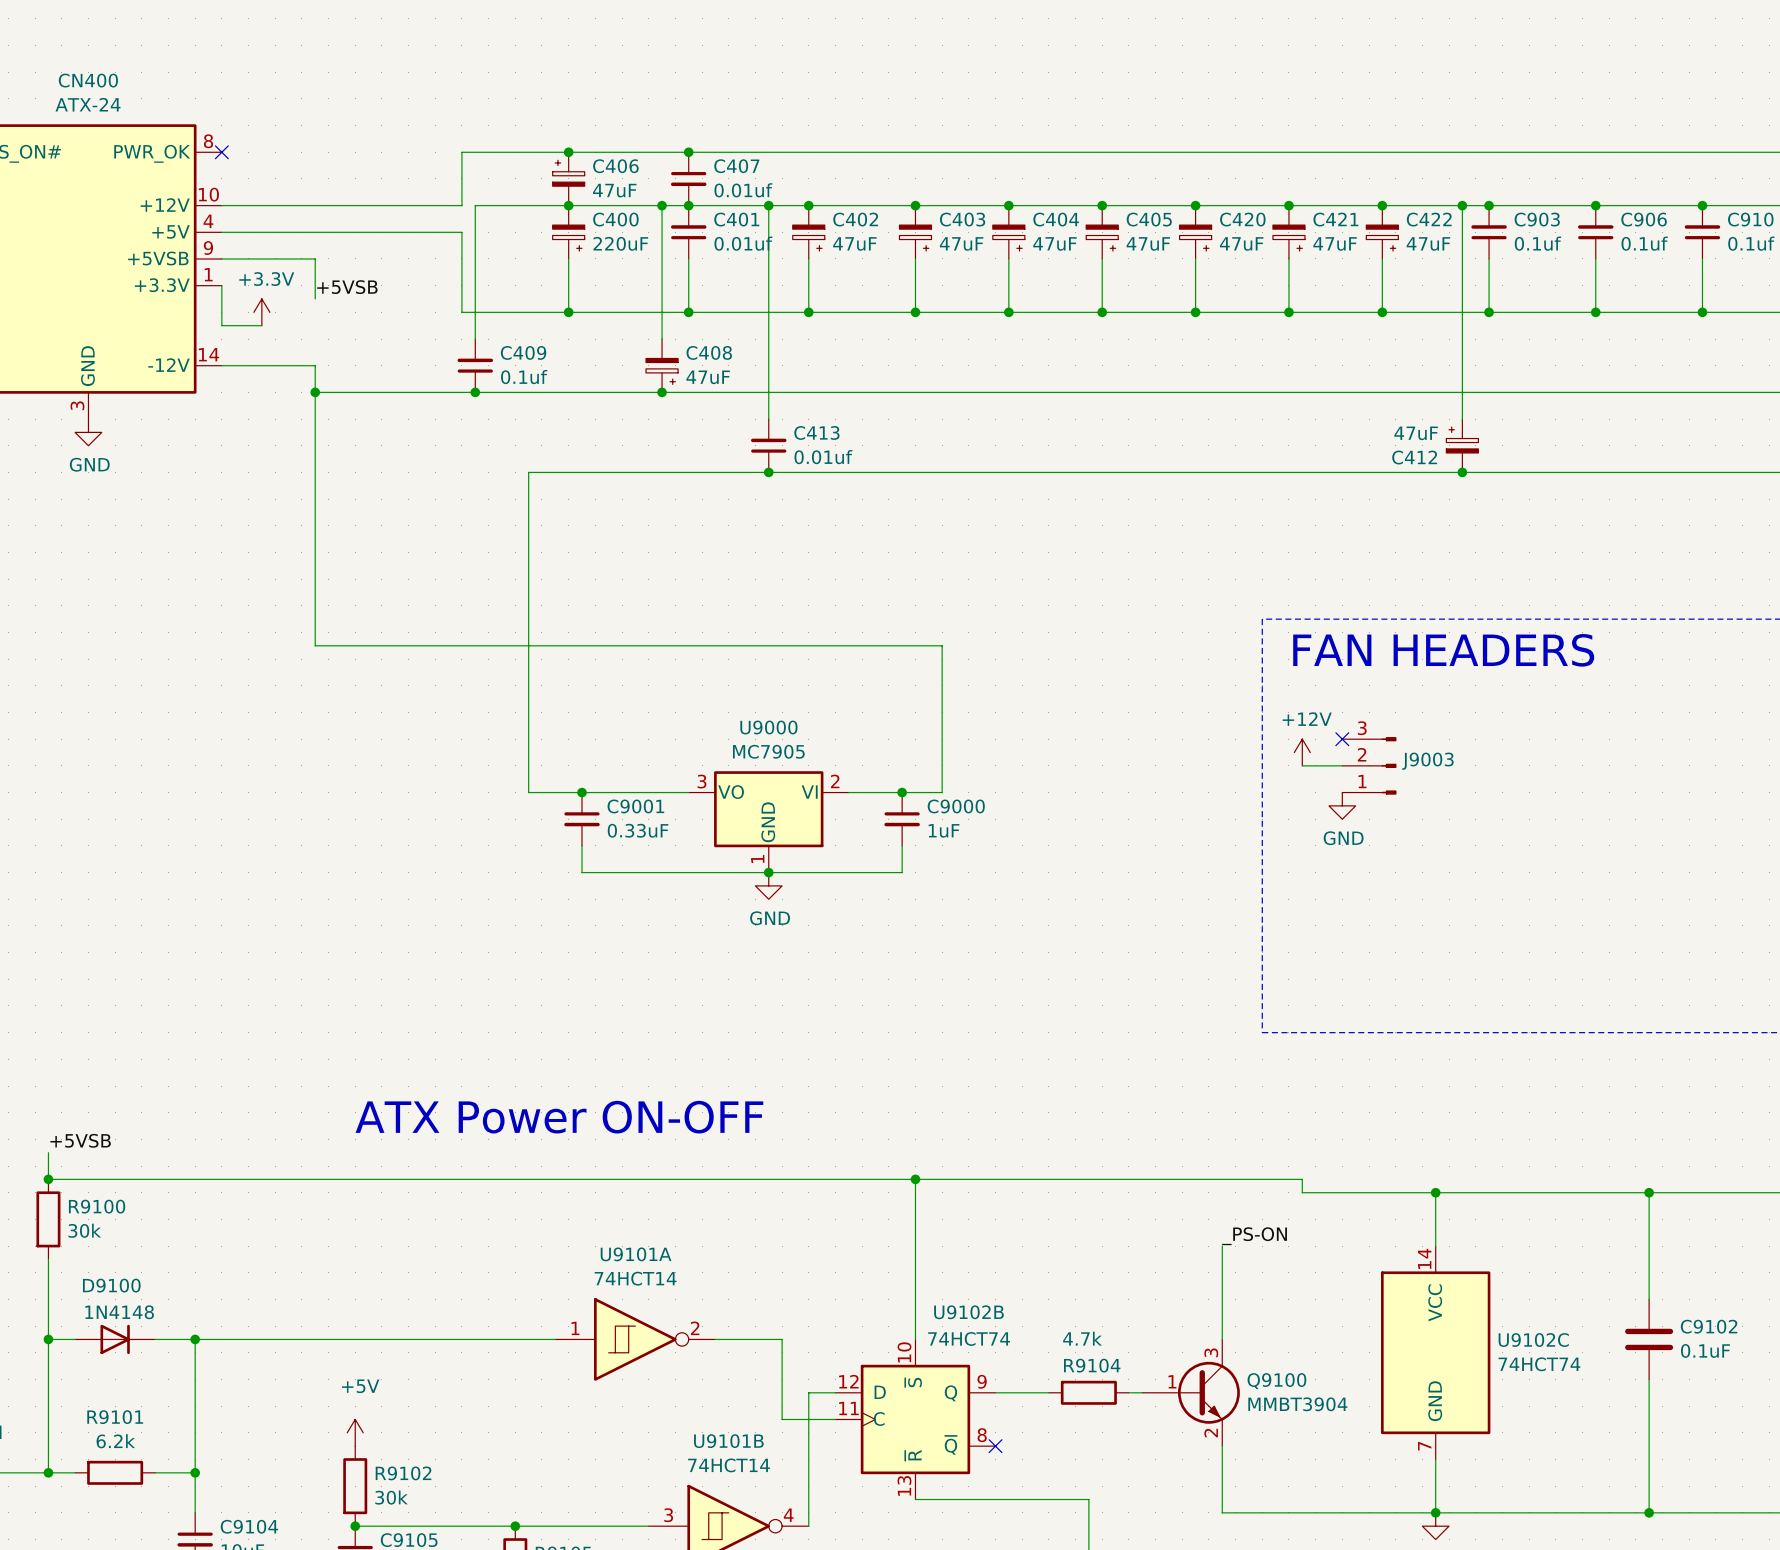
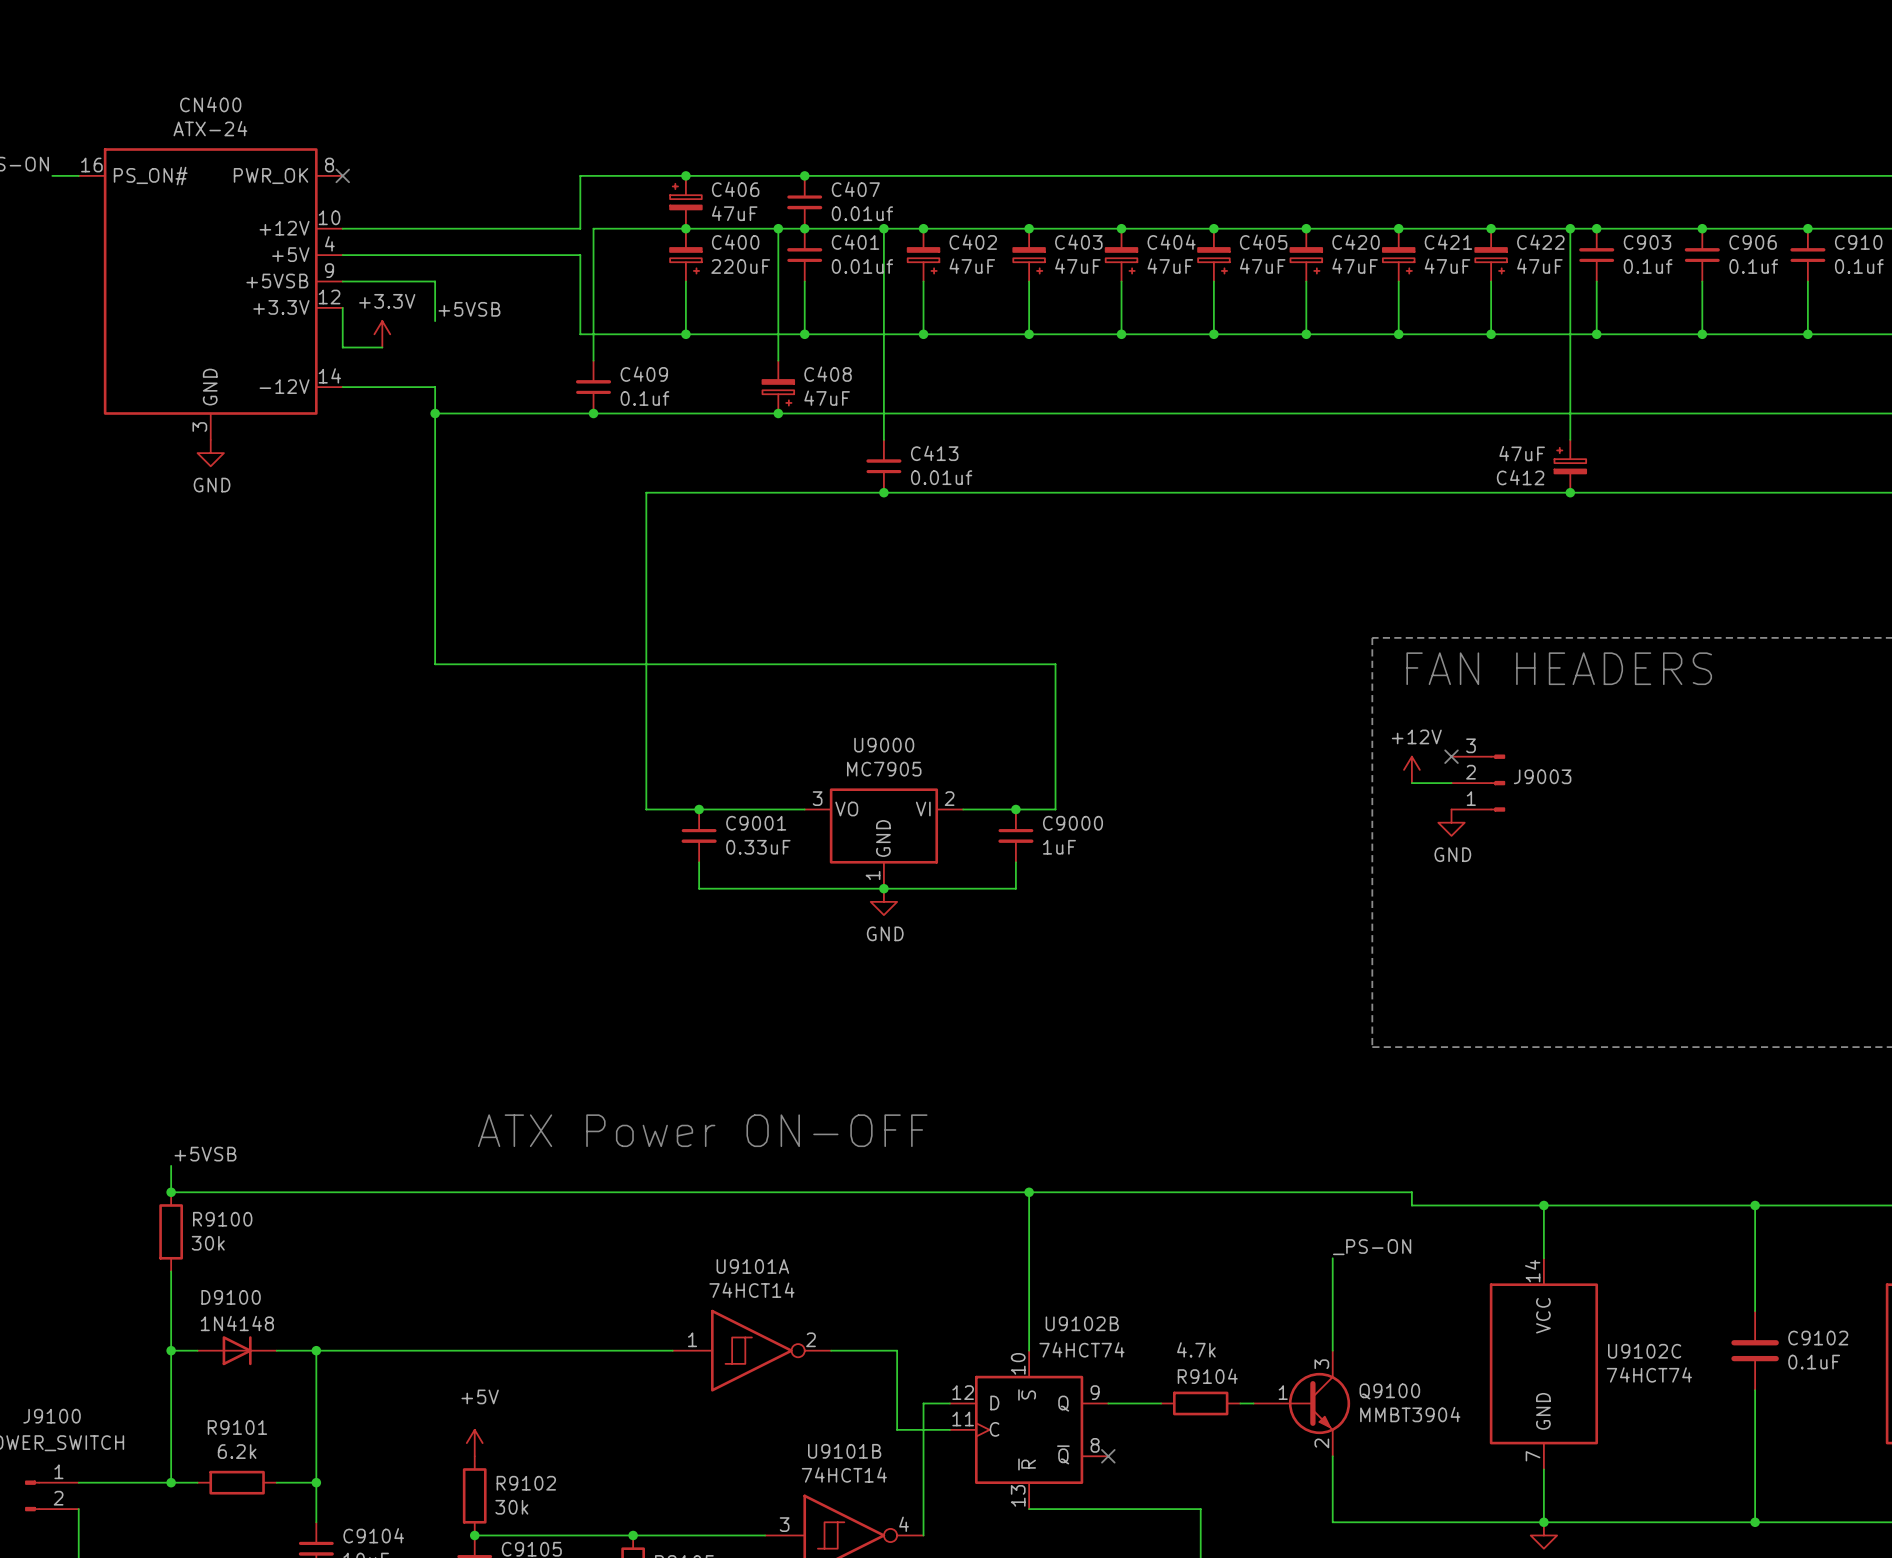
CN400 pin number: 1 (208, 274) -> 12 (329, 297)

